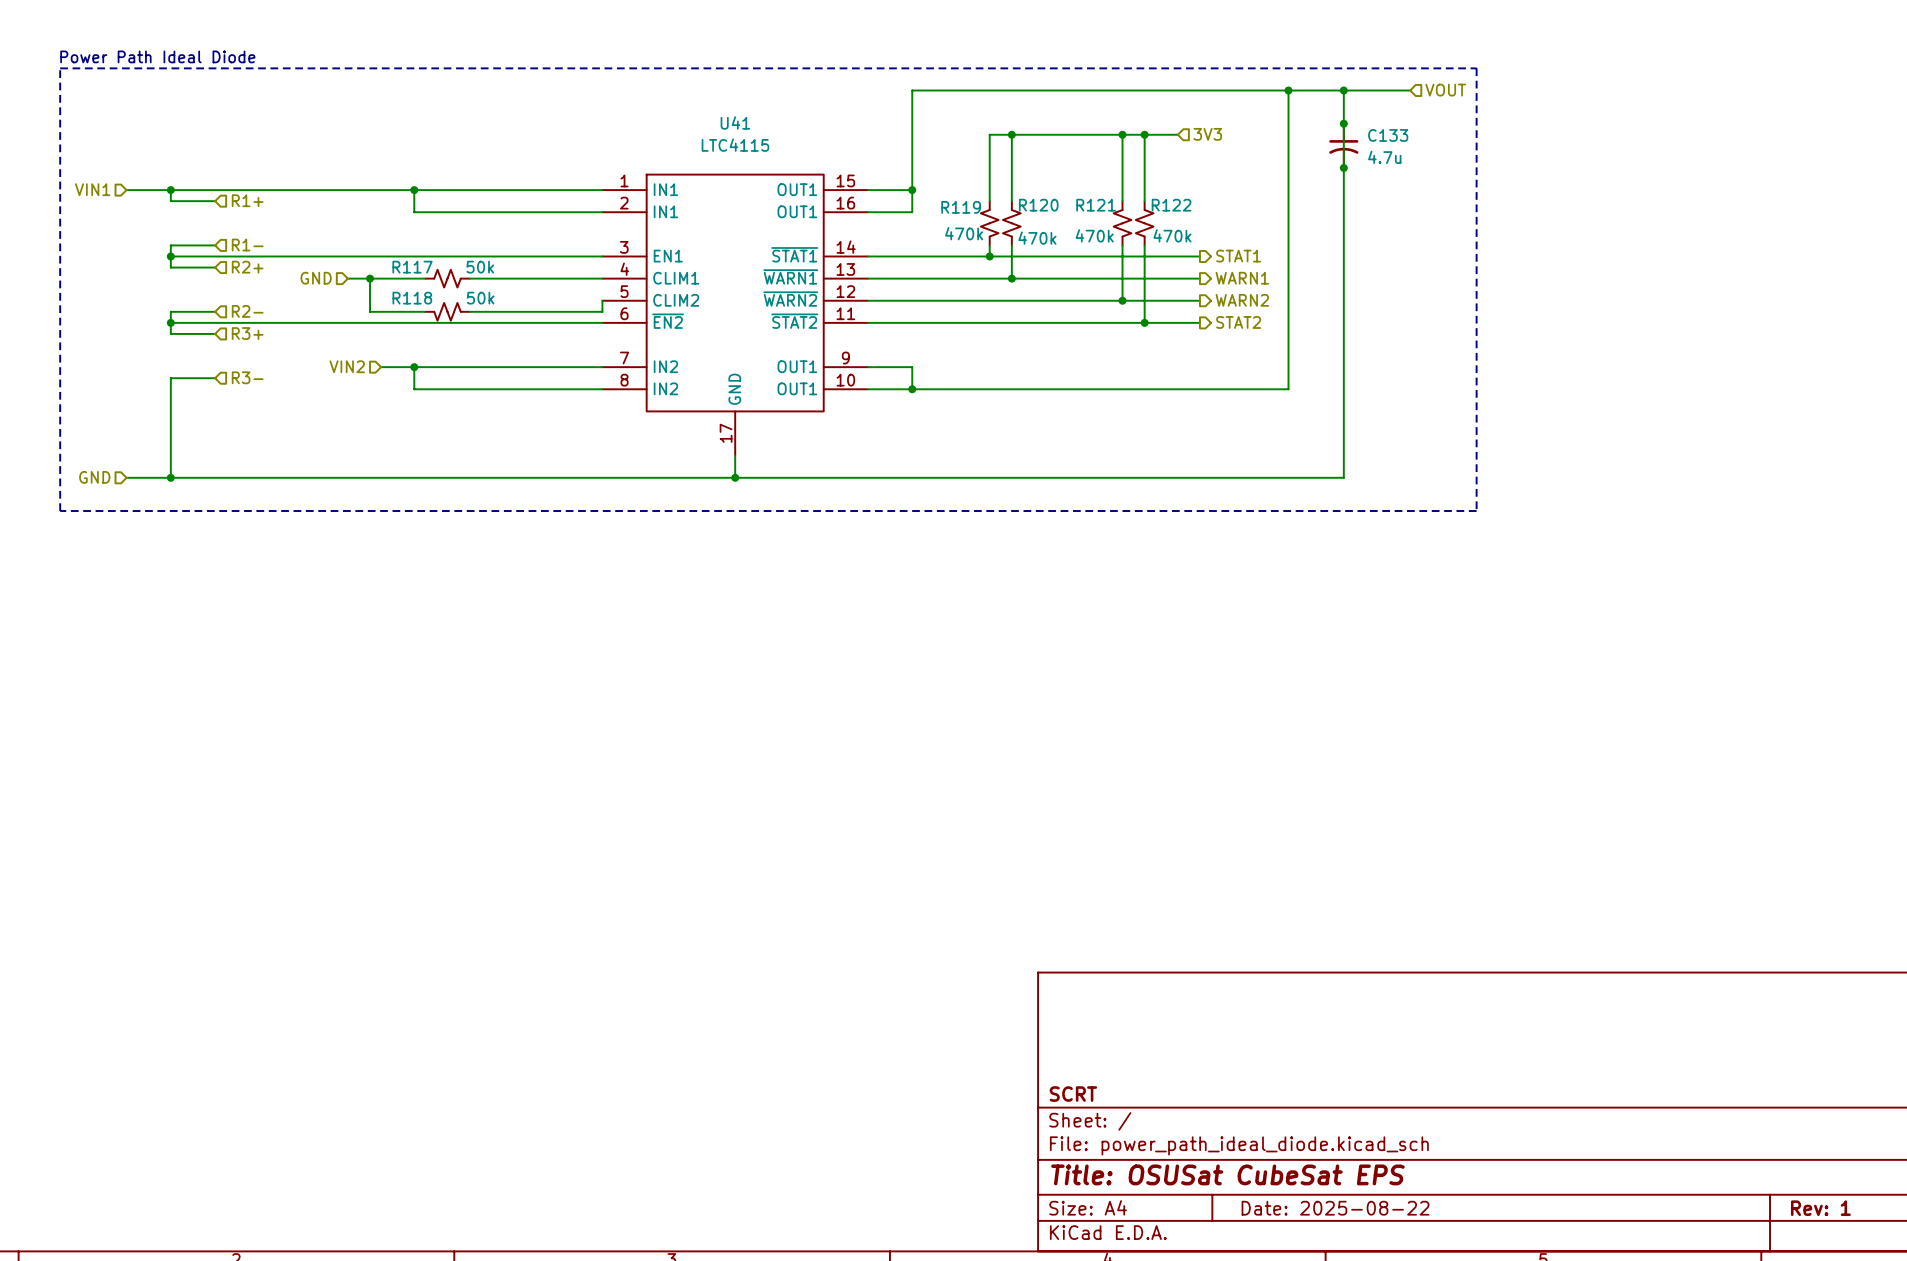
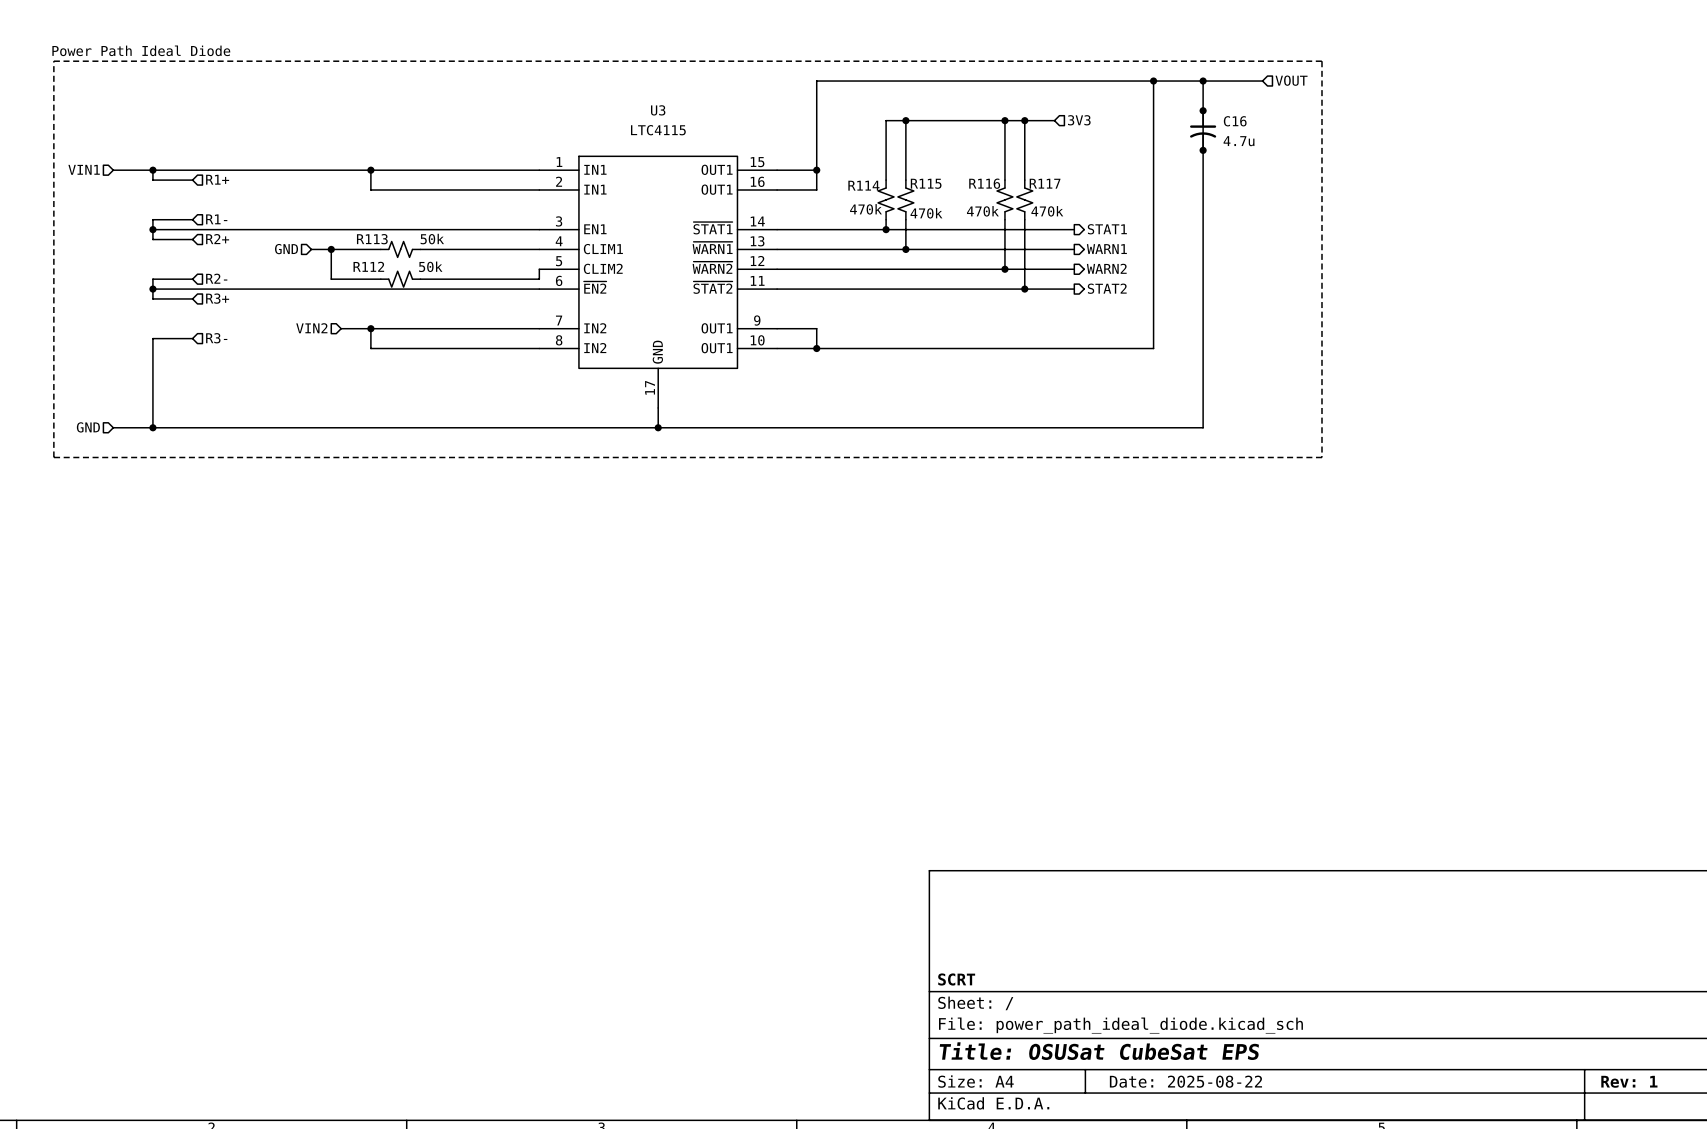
U41 name: U41 (735, 123) -> U3 (658, 110)
C133 name: C133 (1388, 135) -> C16 (1235, 121)
R120 name: R120 (1038, 205) -> R115 (926, 183)
R121 name: R121 (1096, 205) -> R116 (984, 183)
R122 name: R122 (1171, 205) -> R117 (1045, 183)
R119 name: R119 (961, 207) -> R114 (863, 185)
R117 name: R117 (412, 267) -> R113 (372, 239)
R118 name: R118 (412, 298) -> R112 (368, 266)

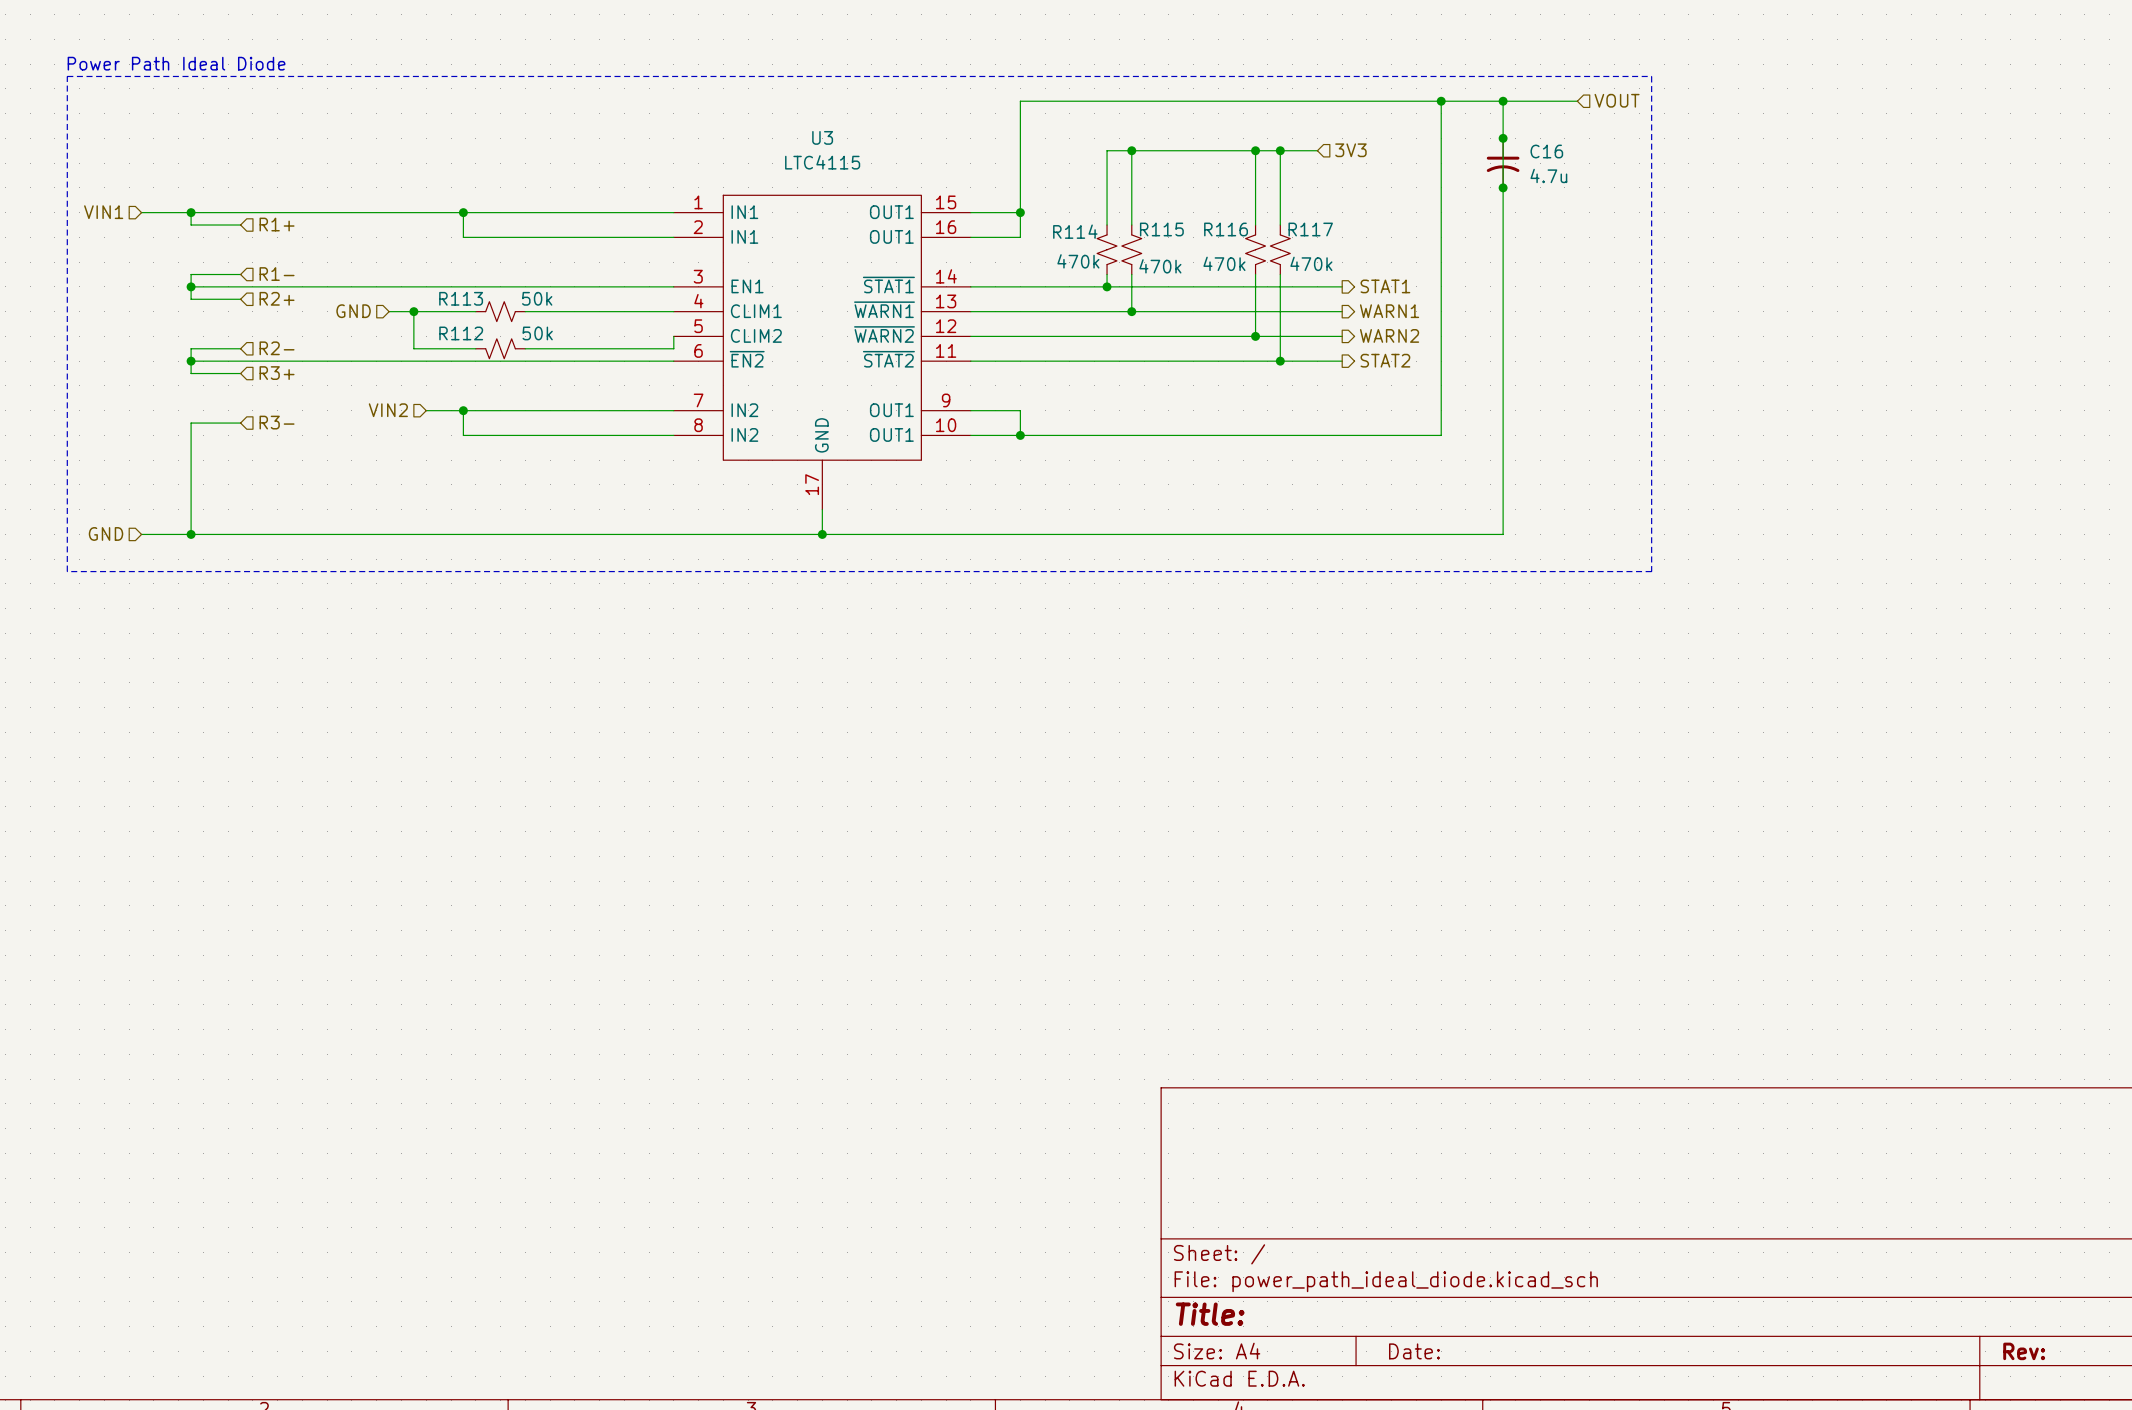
title block: SCRT (956, 979) -> none
title block: Title: OSUSat CubeSat EPS (1099, 1051) -> Title: (1210, 1314)
title block: Date: 2025-08-22 (1185, 1081) -> Date: (1414, 1351)
title block: Rev: 1 (1629, 1081) -> Rev: (2024, 1351)

